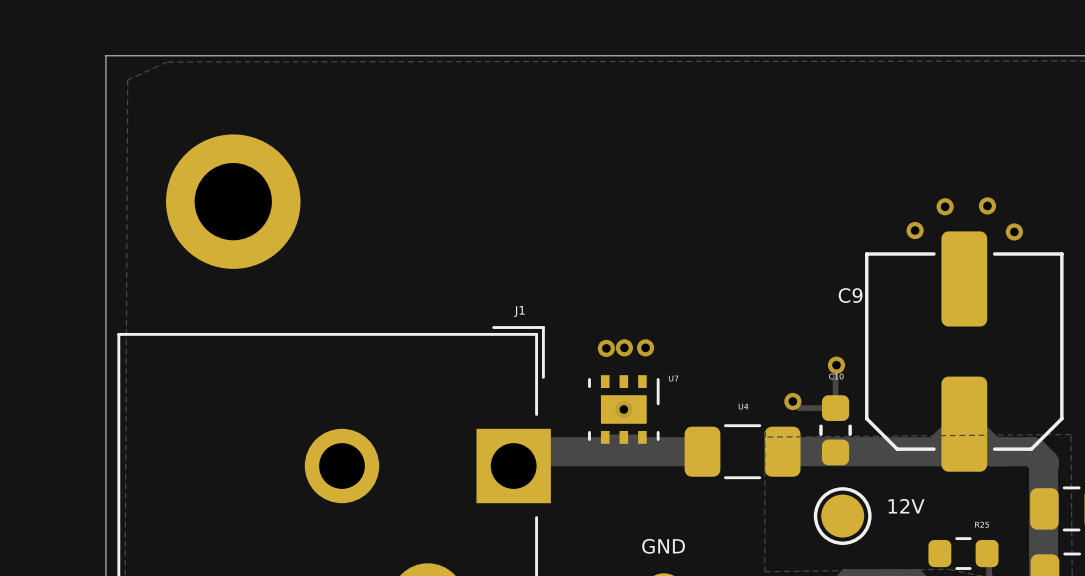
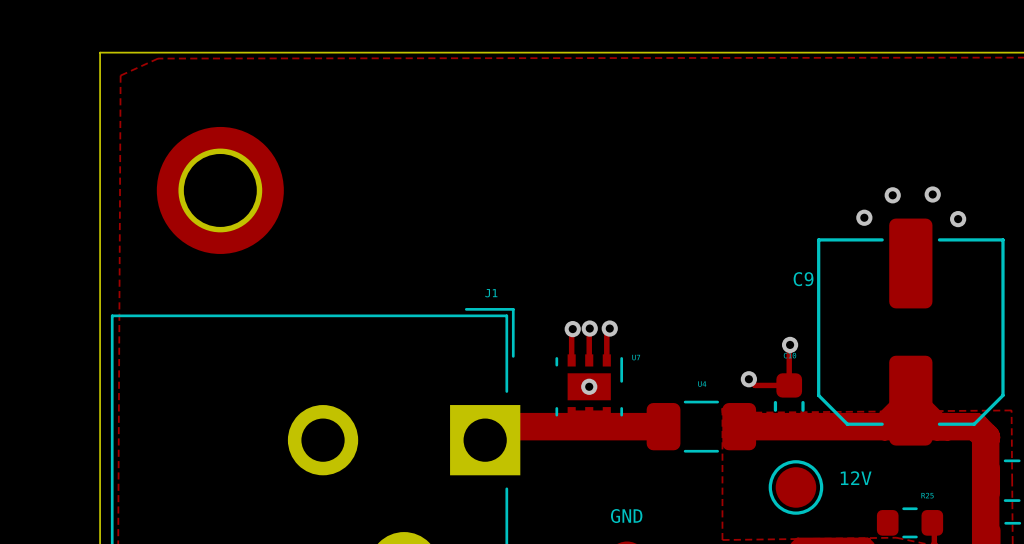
track: none -> (568, 329) (571, 332) (571, 360)
track: none -> (589, 329) (589, 360)
track: none -> (609, 329) (606, 332) (606, 360)

